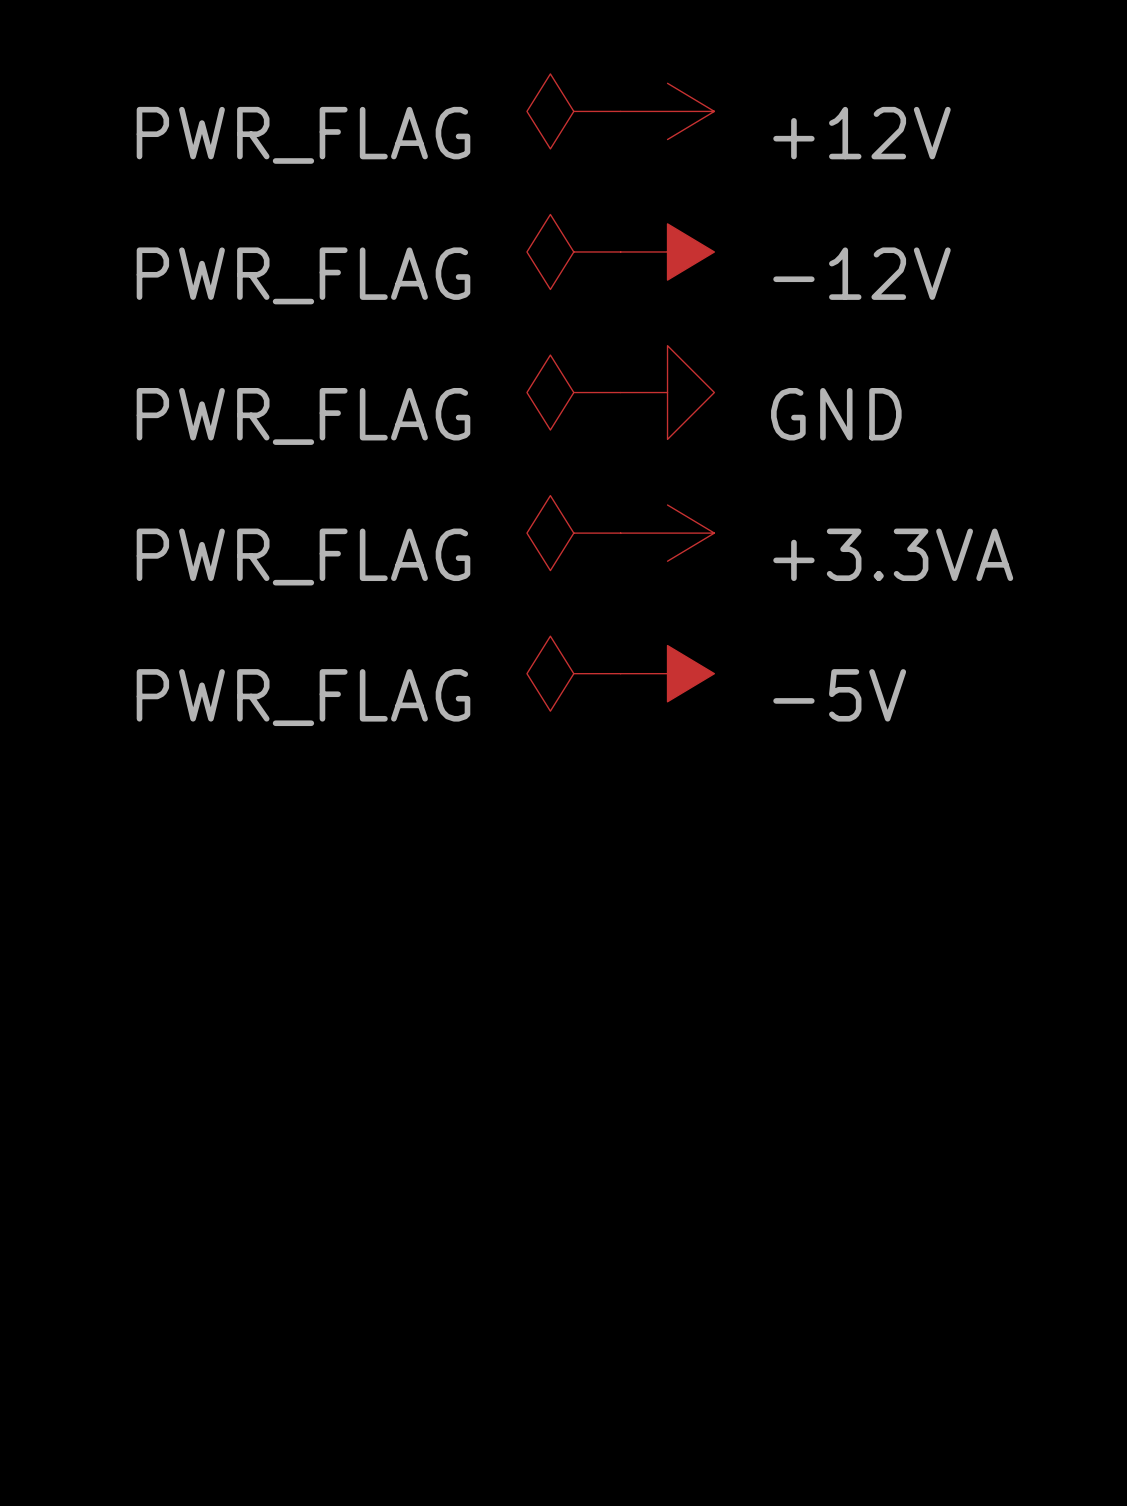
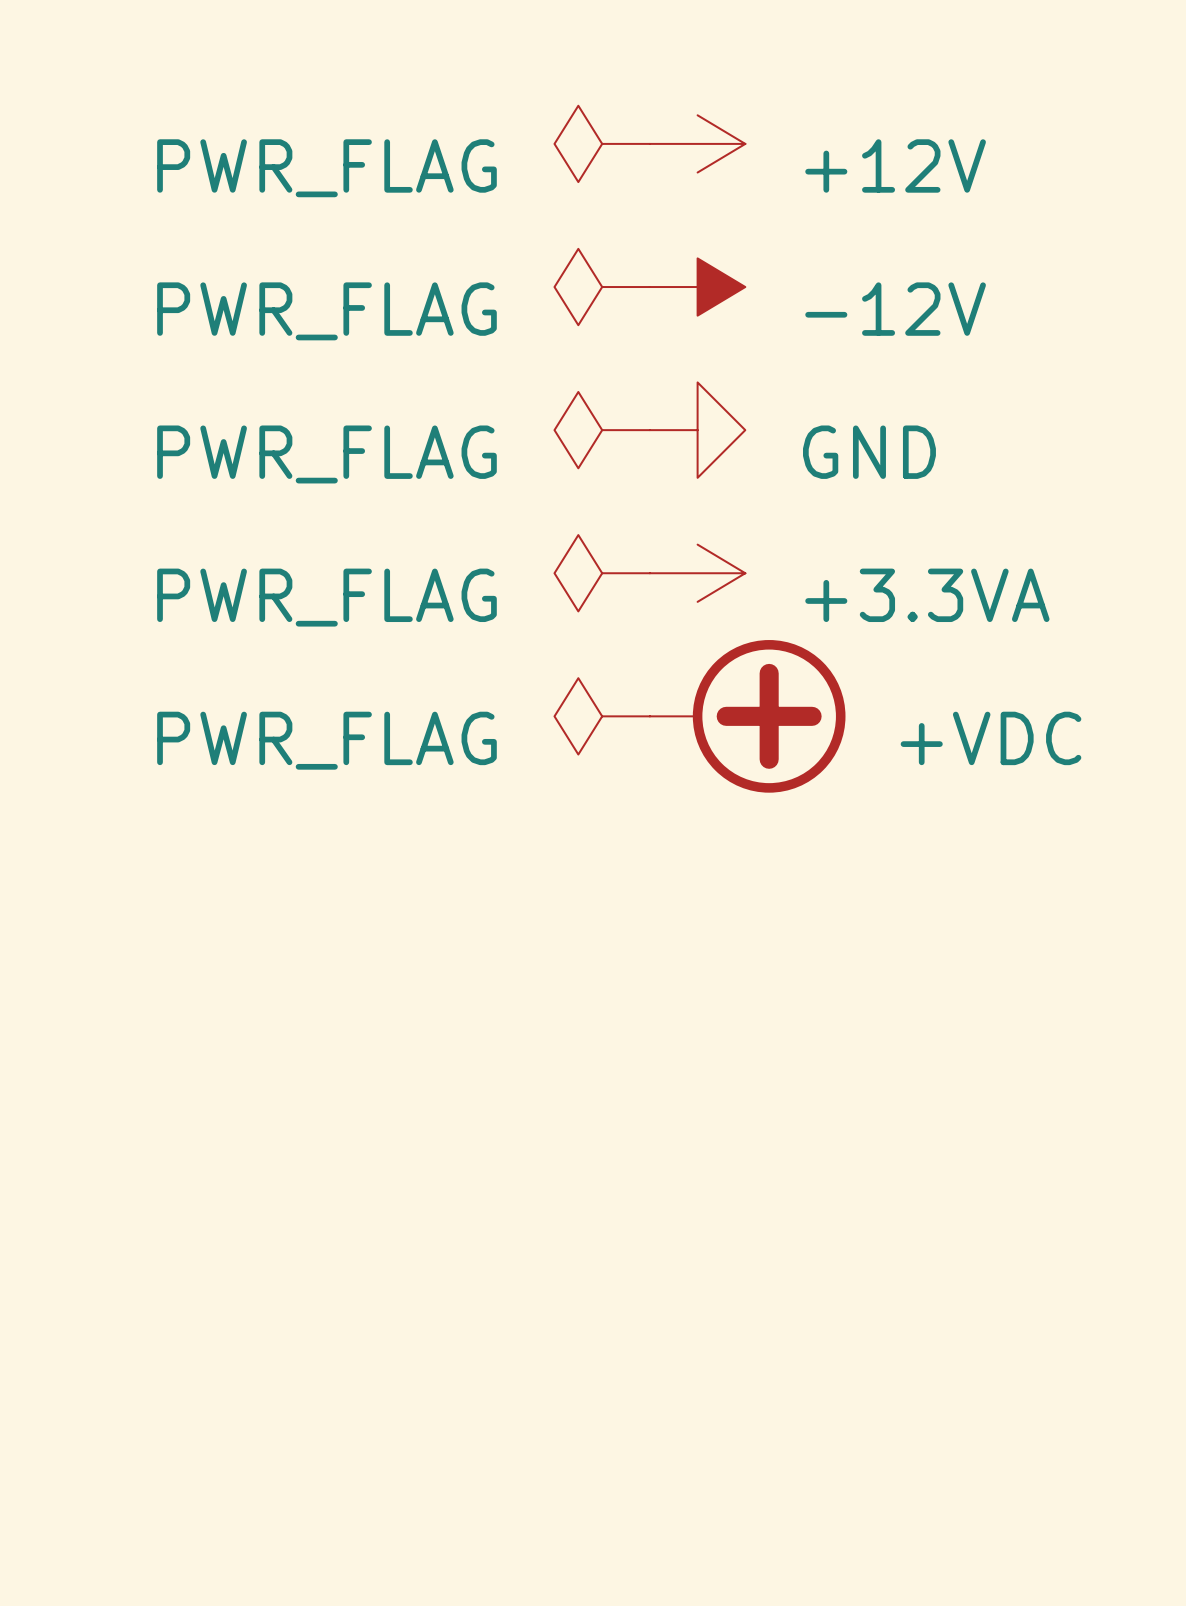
power symbol: -5V (667, 673) -> none
power symbol: none -> +VDC (747, 716)

